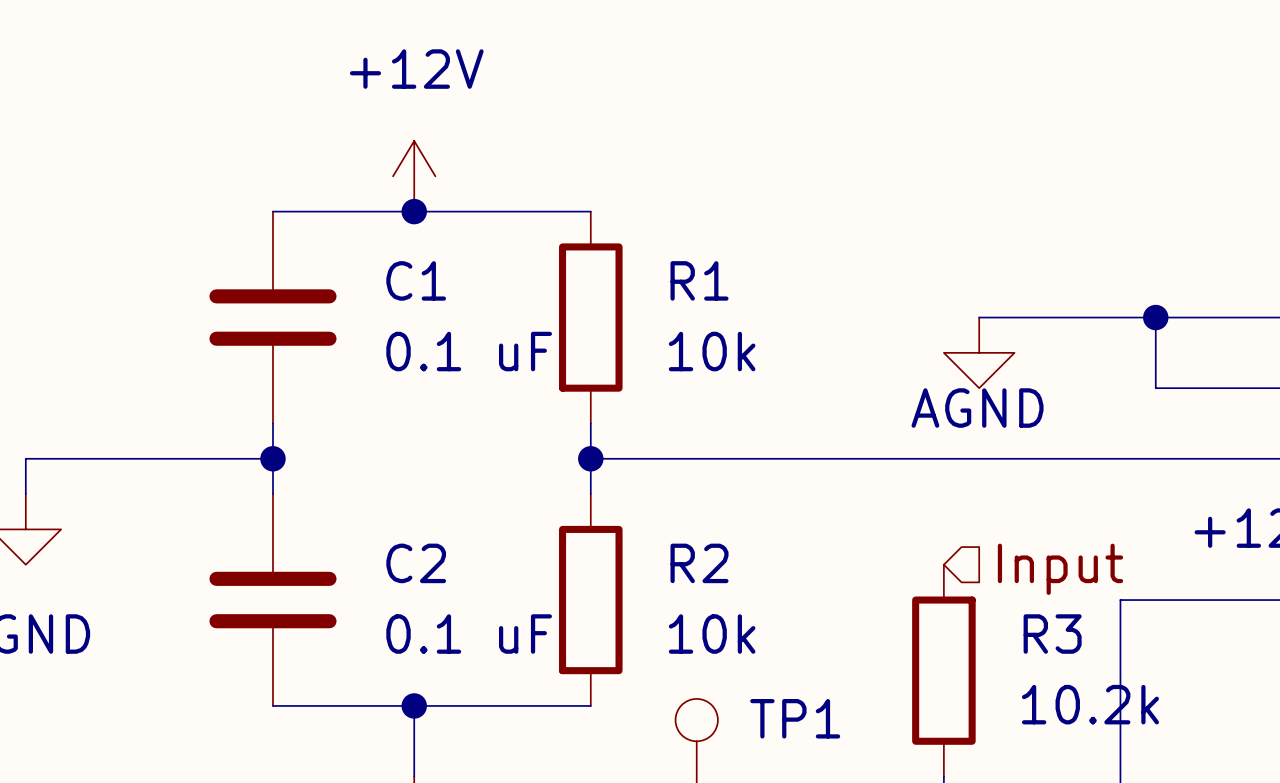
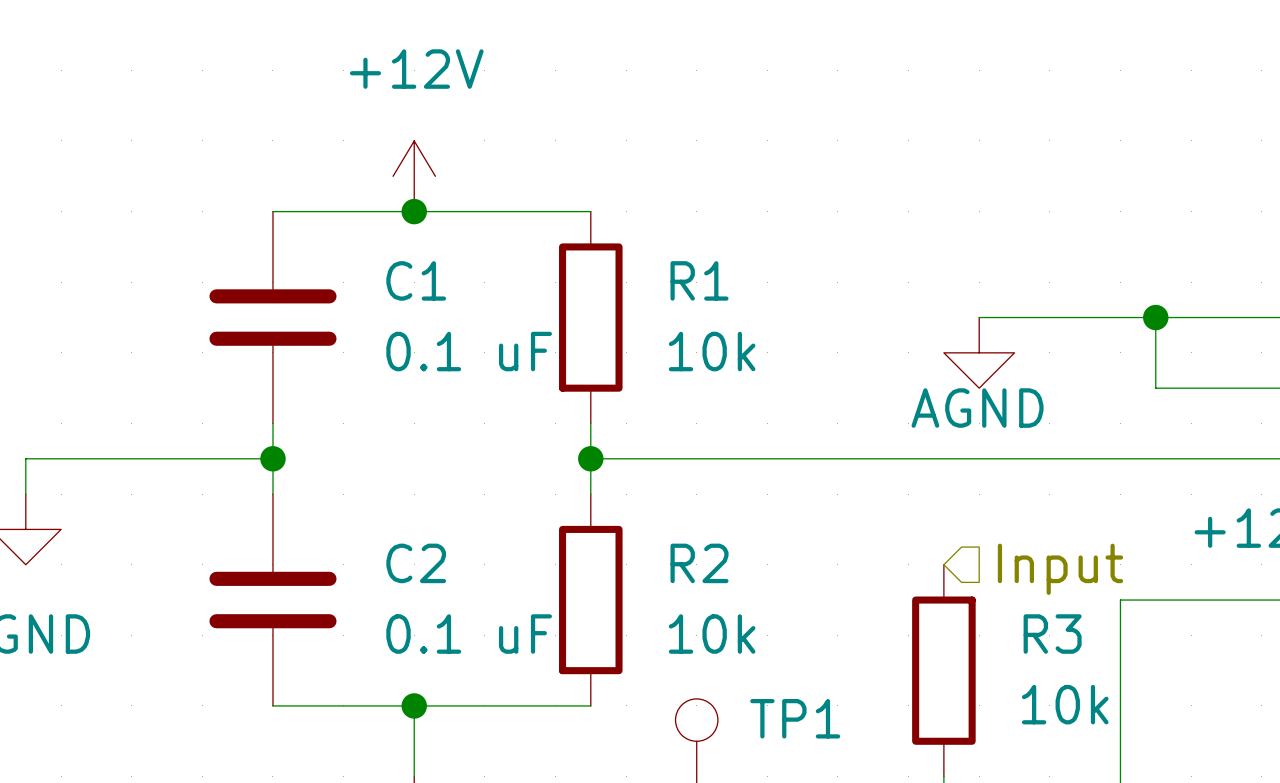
R3 value: 10.2k (1090, 704) -> 10k (1065, 704)

